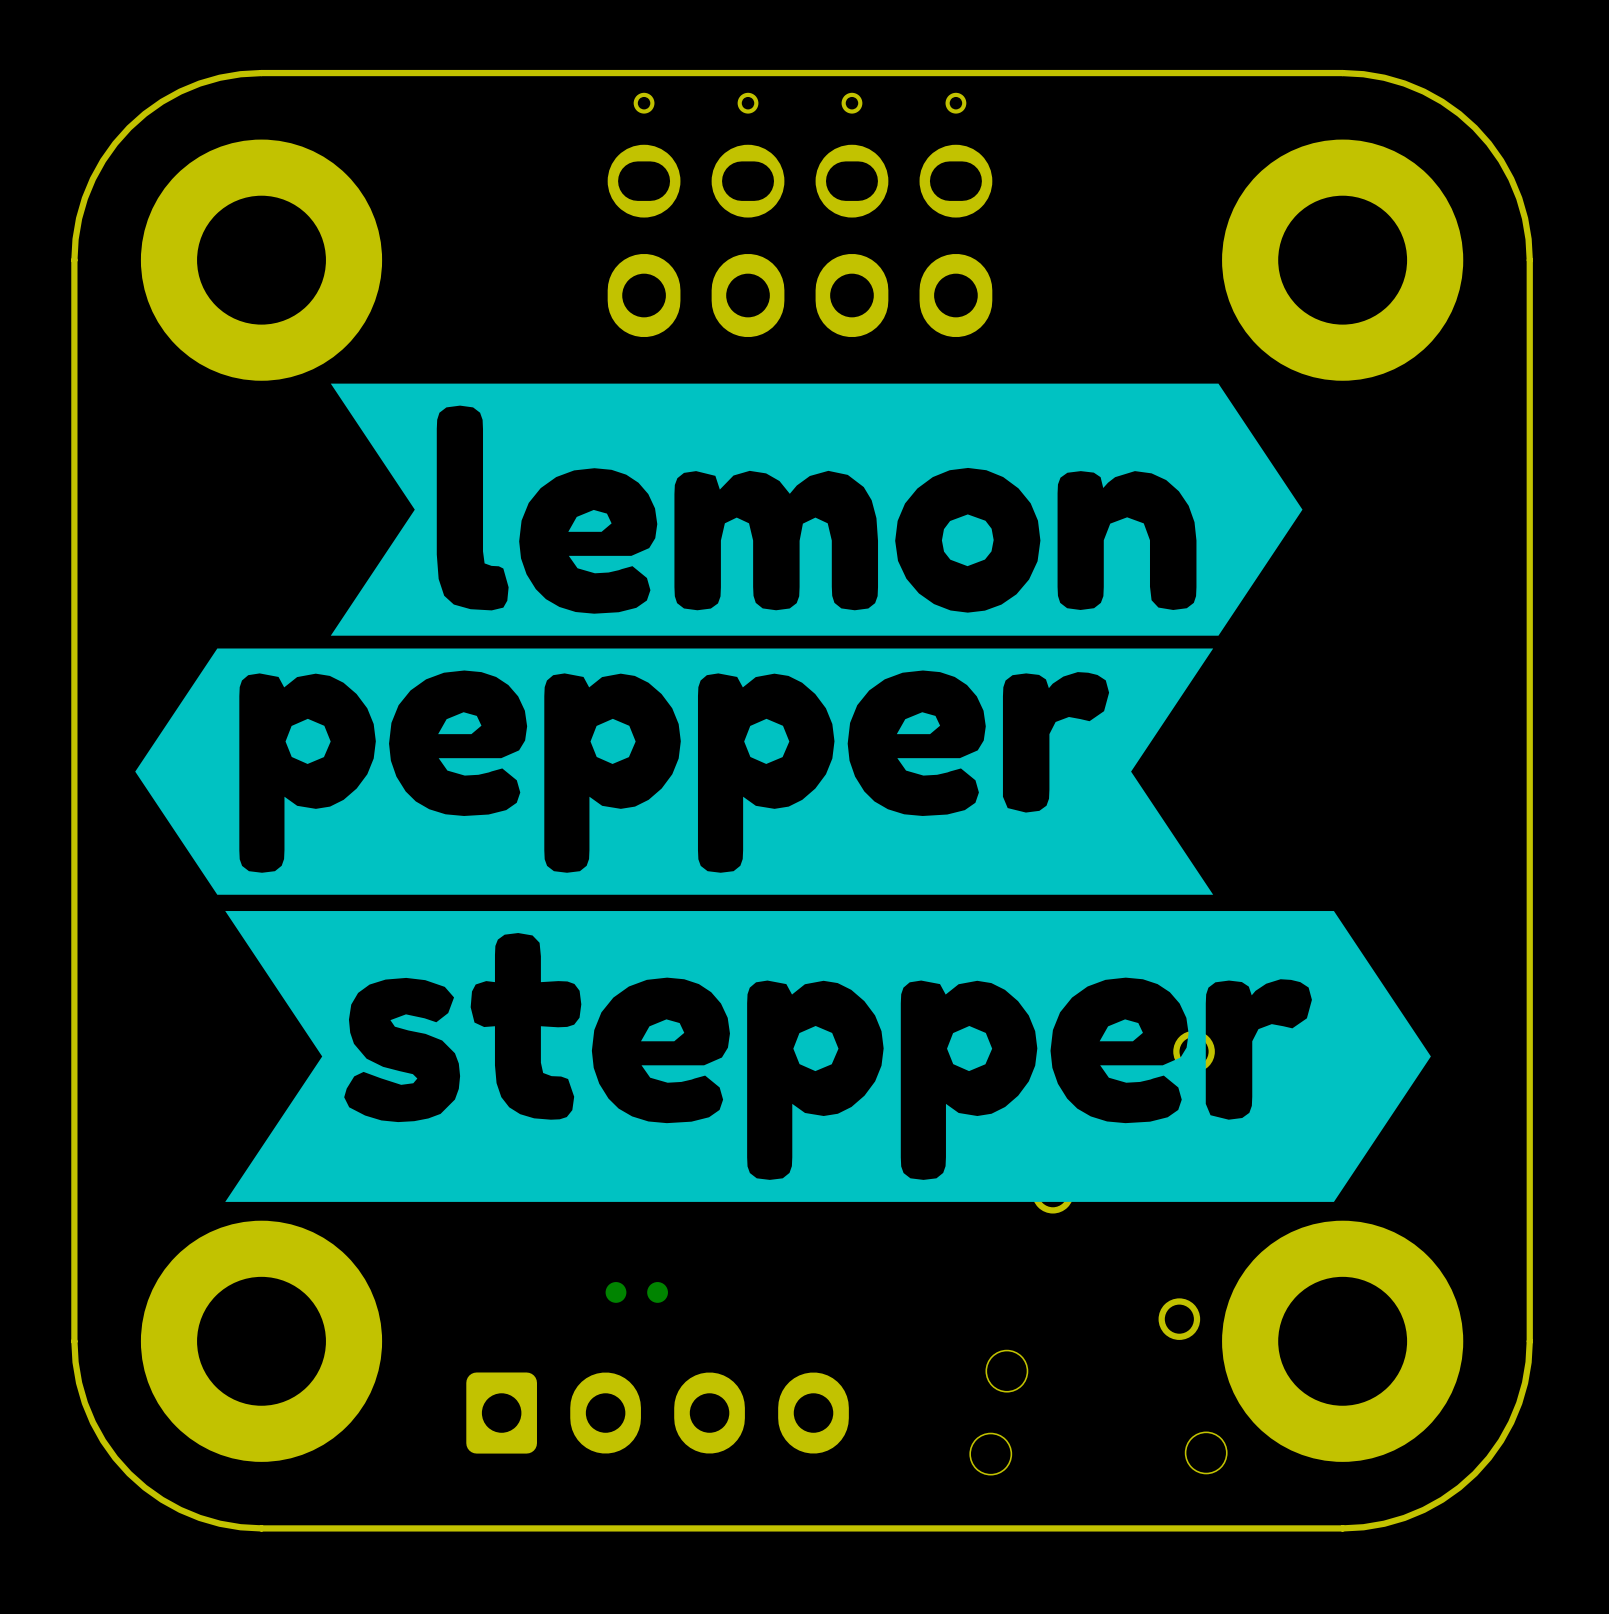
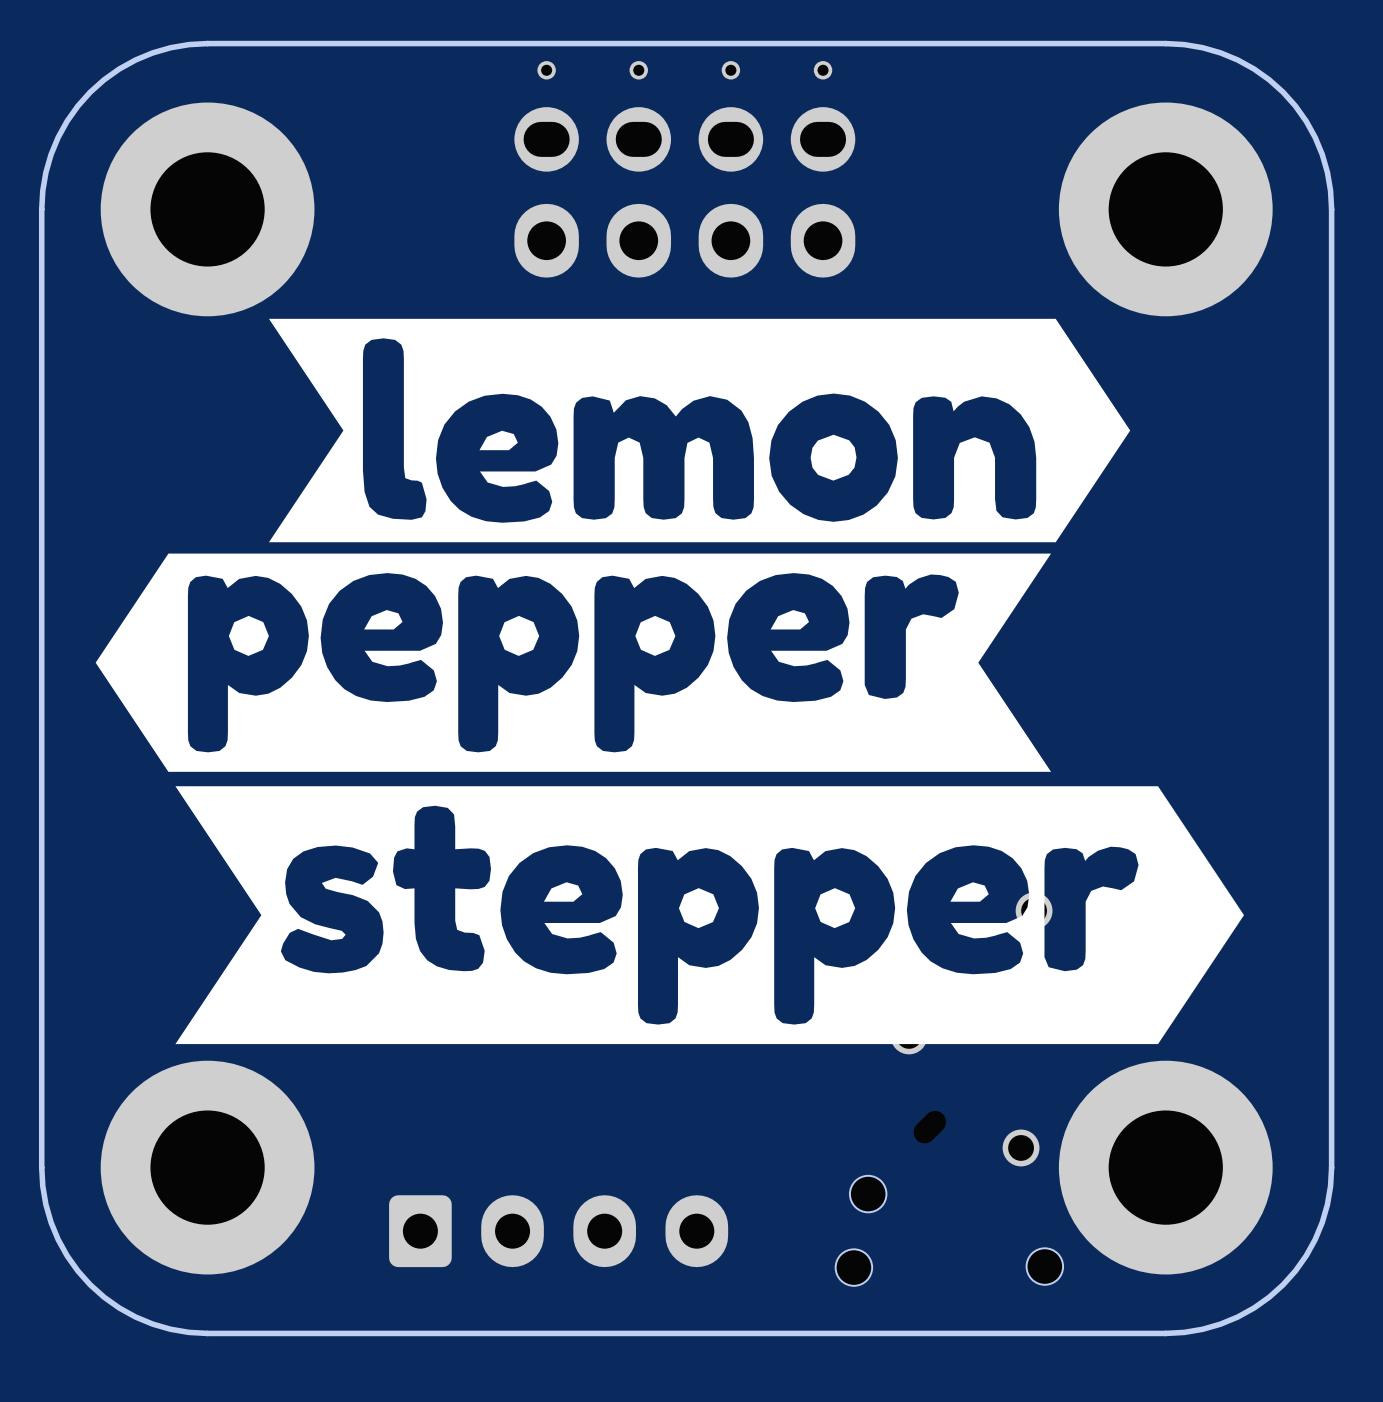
part: (636, 1292) -> none

